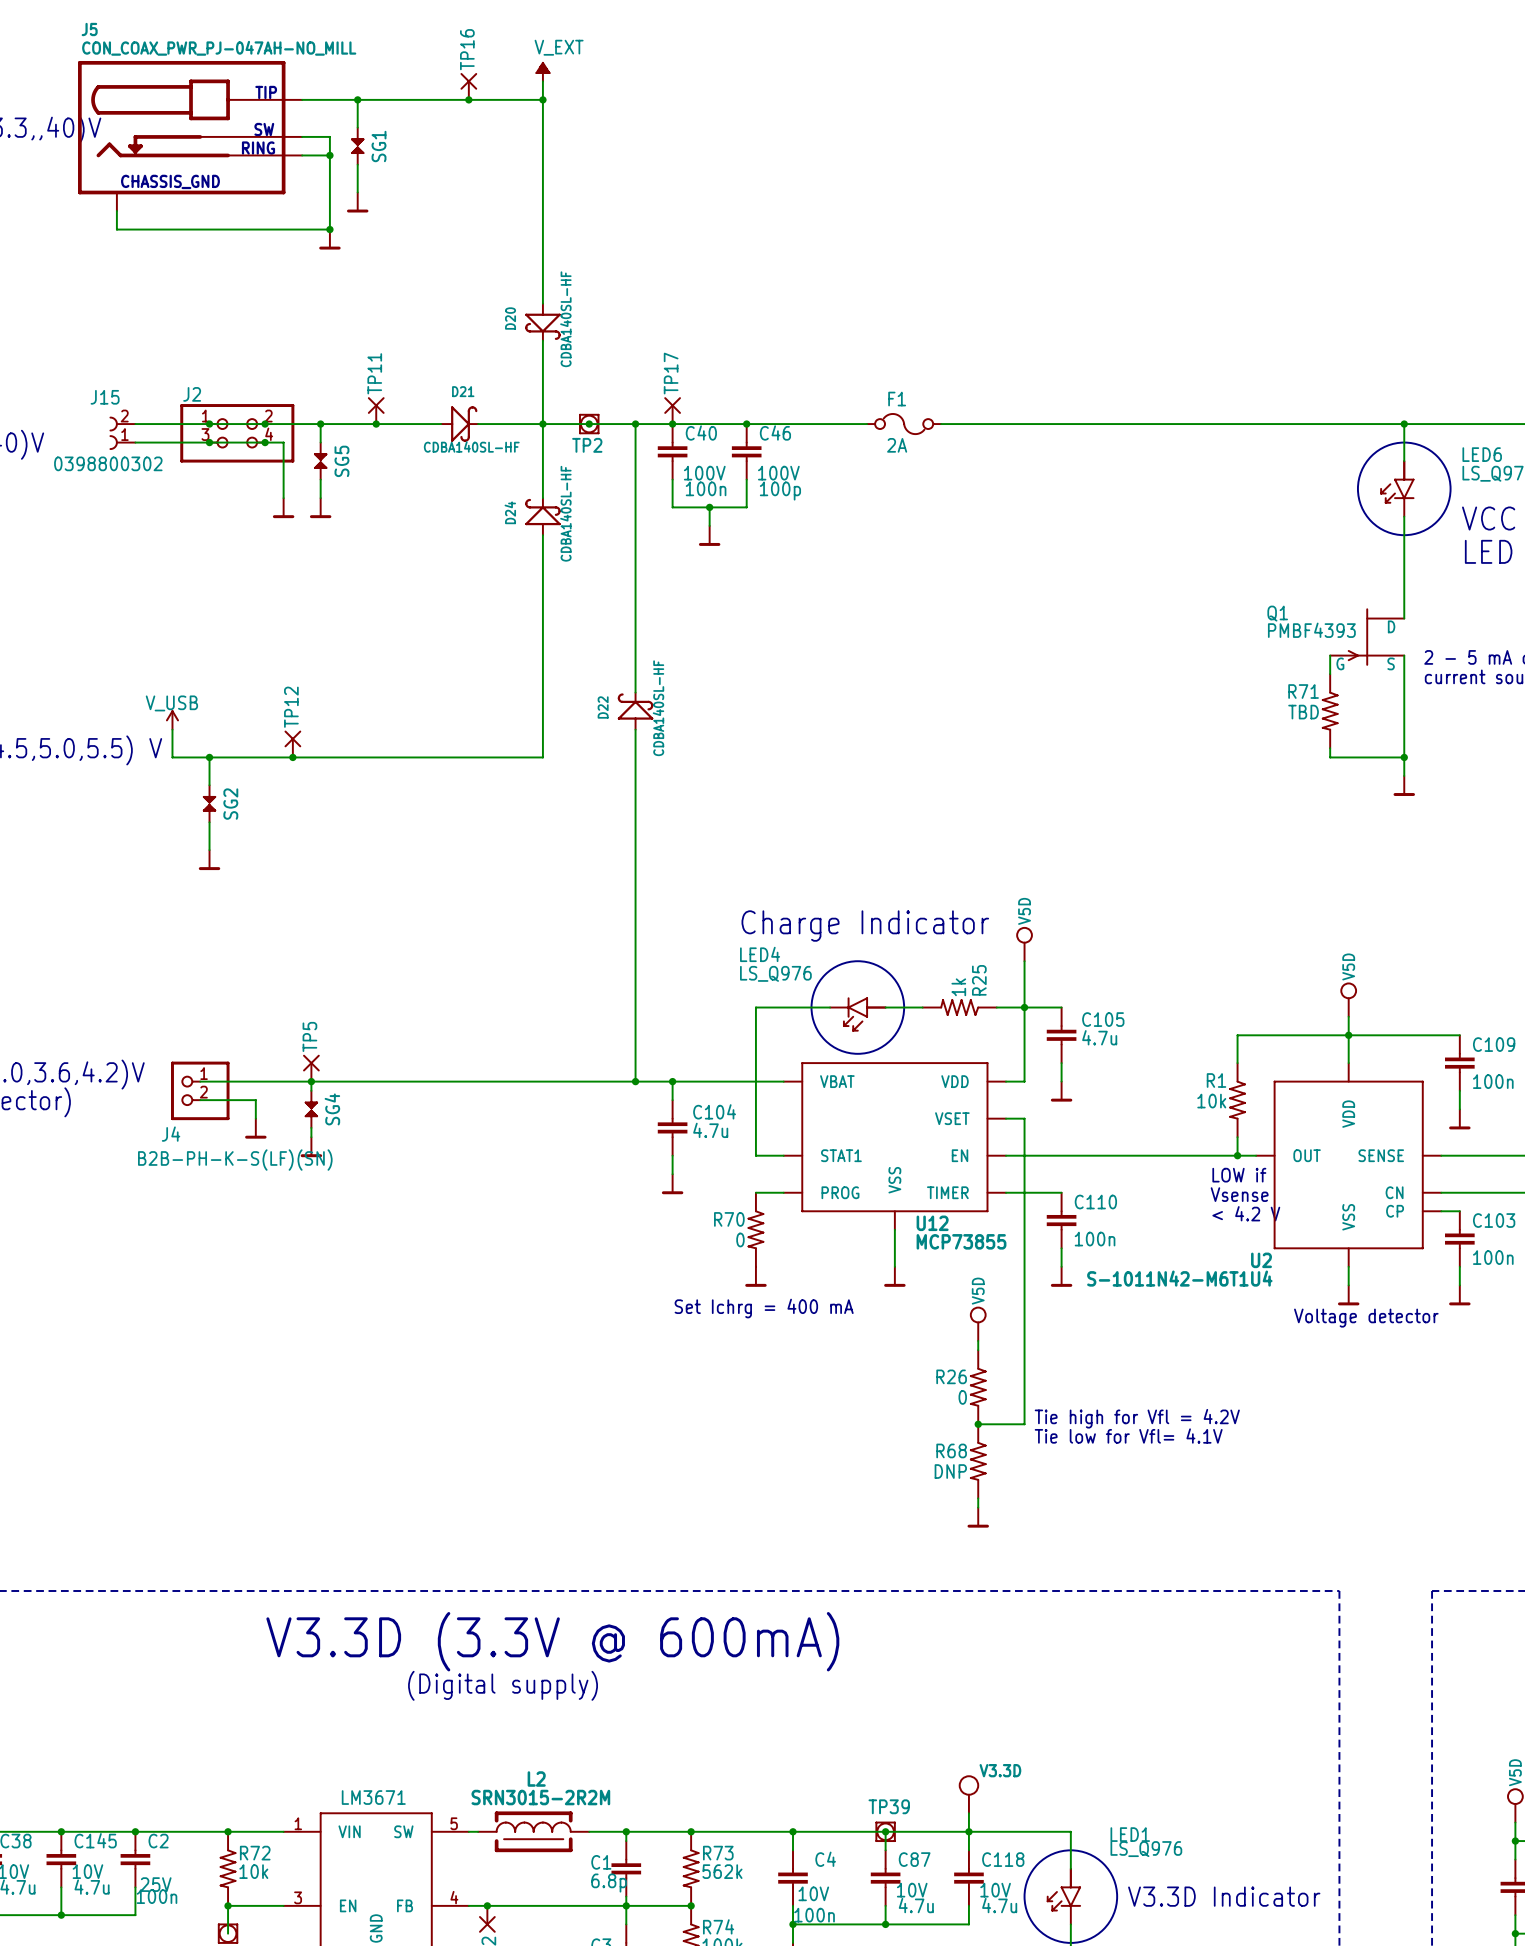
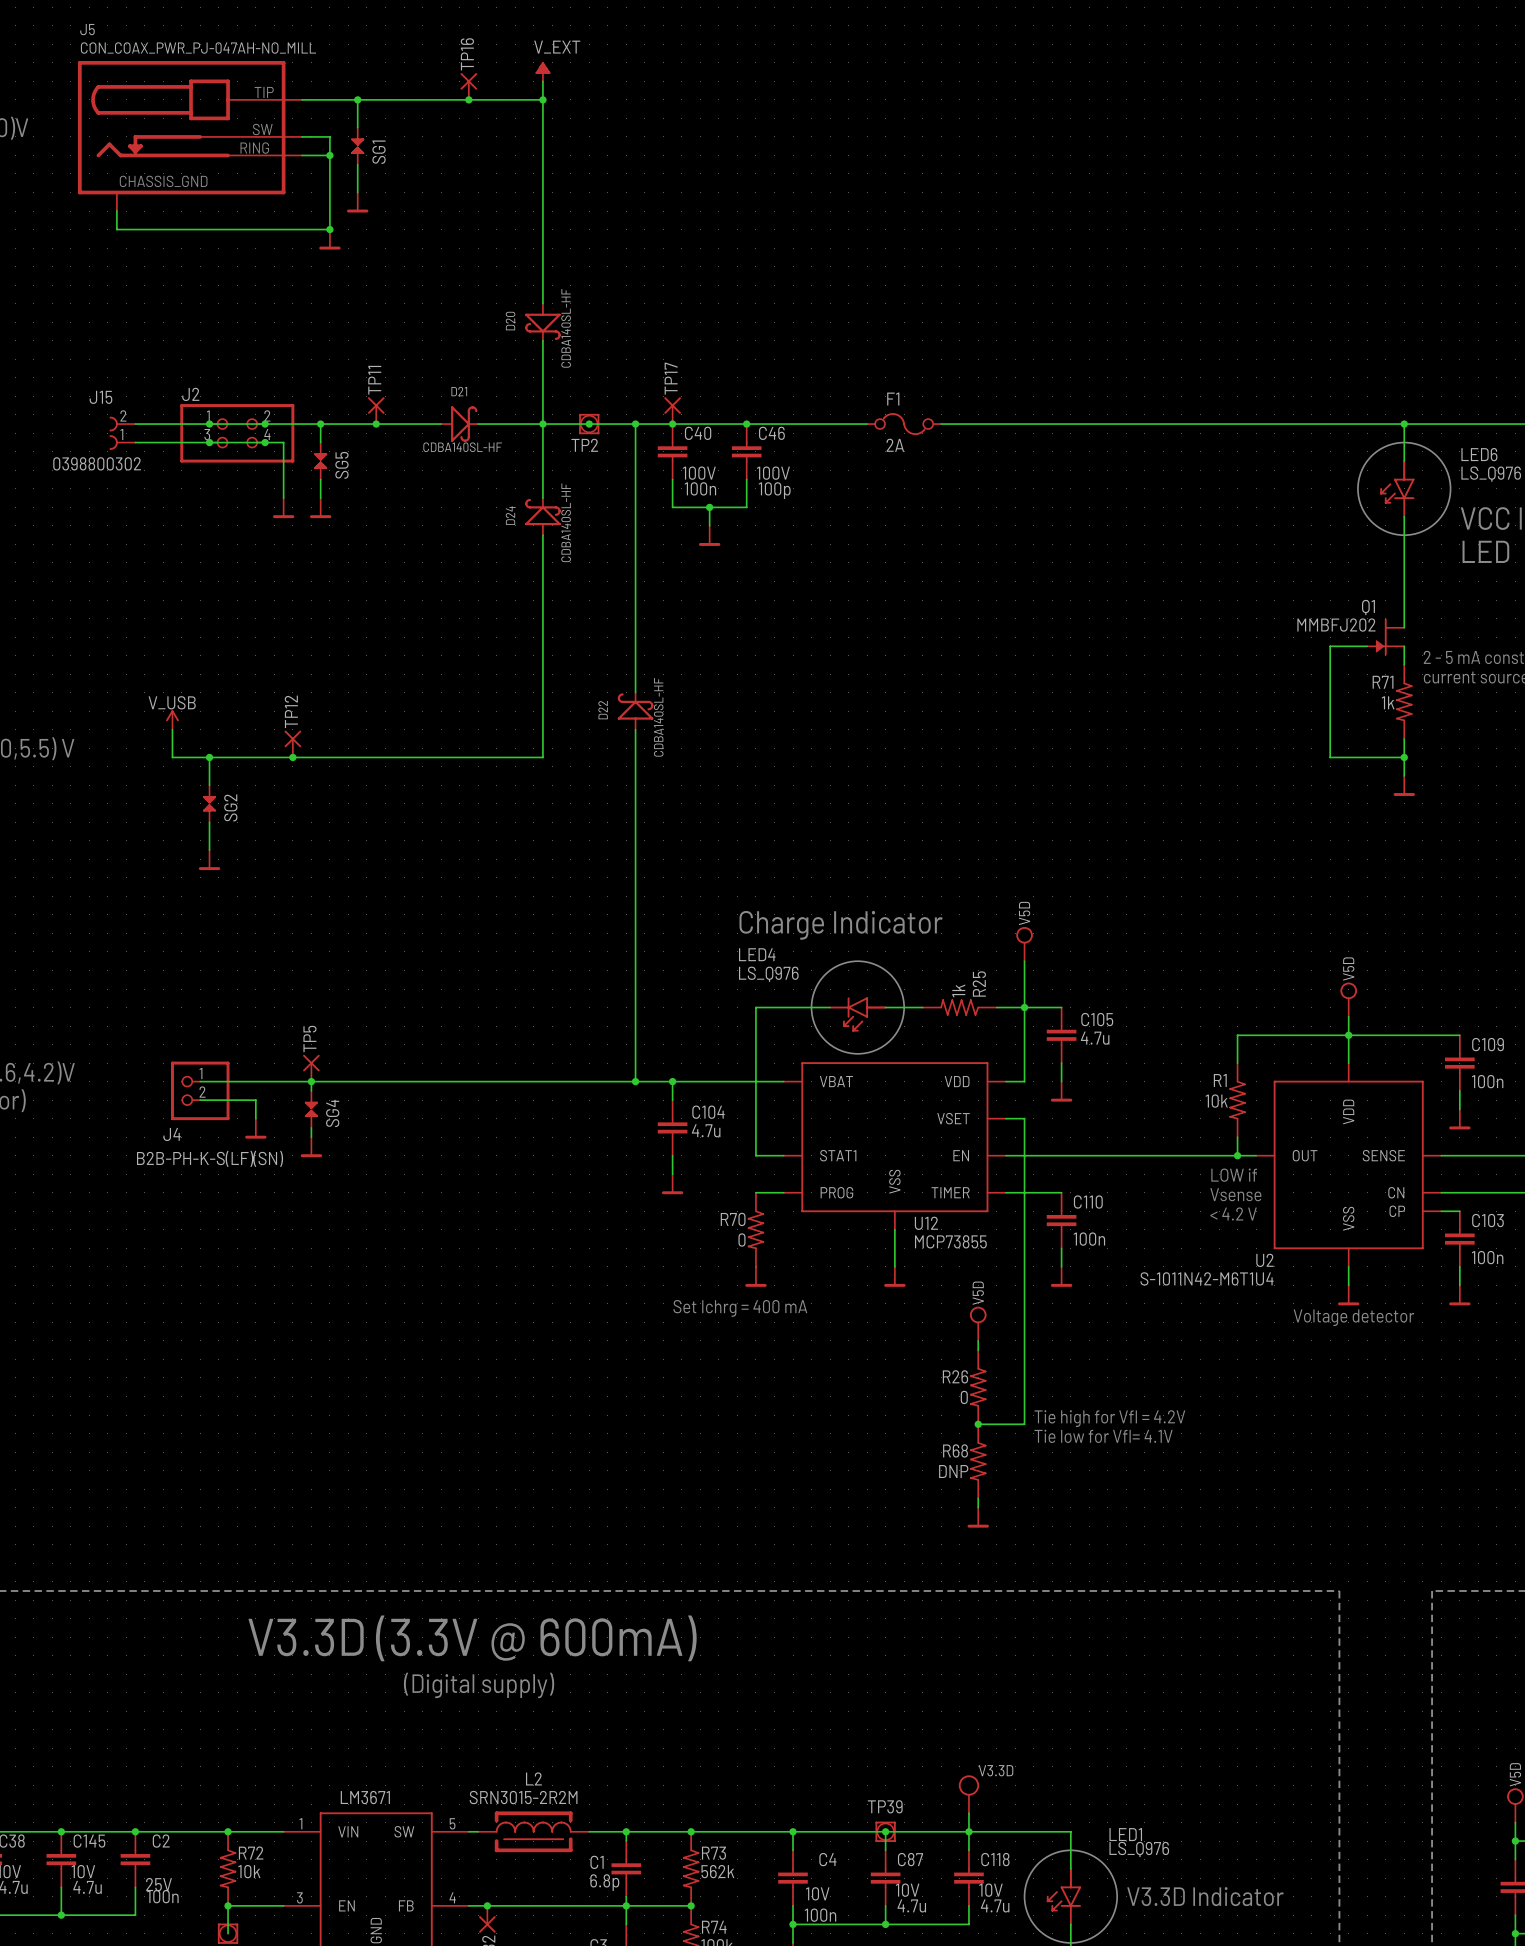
Q1 symbol: [1330, 608, 1405, 666] -> [1367, 618, 1405, 656]
Q1 name position: Q1 (1277, 613) -> Q1 (1368, 607)
wire: none -> (1404, 618) (1404, 627)
Q1 value: PMBF4393 (1311, 630) -> MMBFJ202 (1336, 625)
wire: none -> (1367, 646) (1330, 646) (1330, 655)
wire: none -> (1404, 646) (1404, 655)
R71 position: (1330, 711) -> (1404, 701)
R71 value: TBD (1303, 712) -> 1k (1388, 702)

